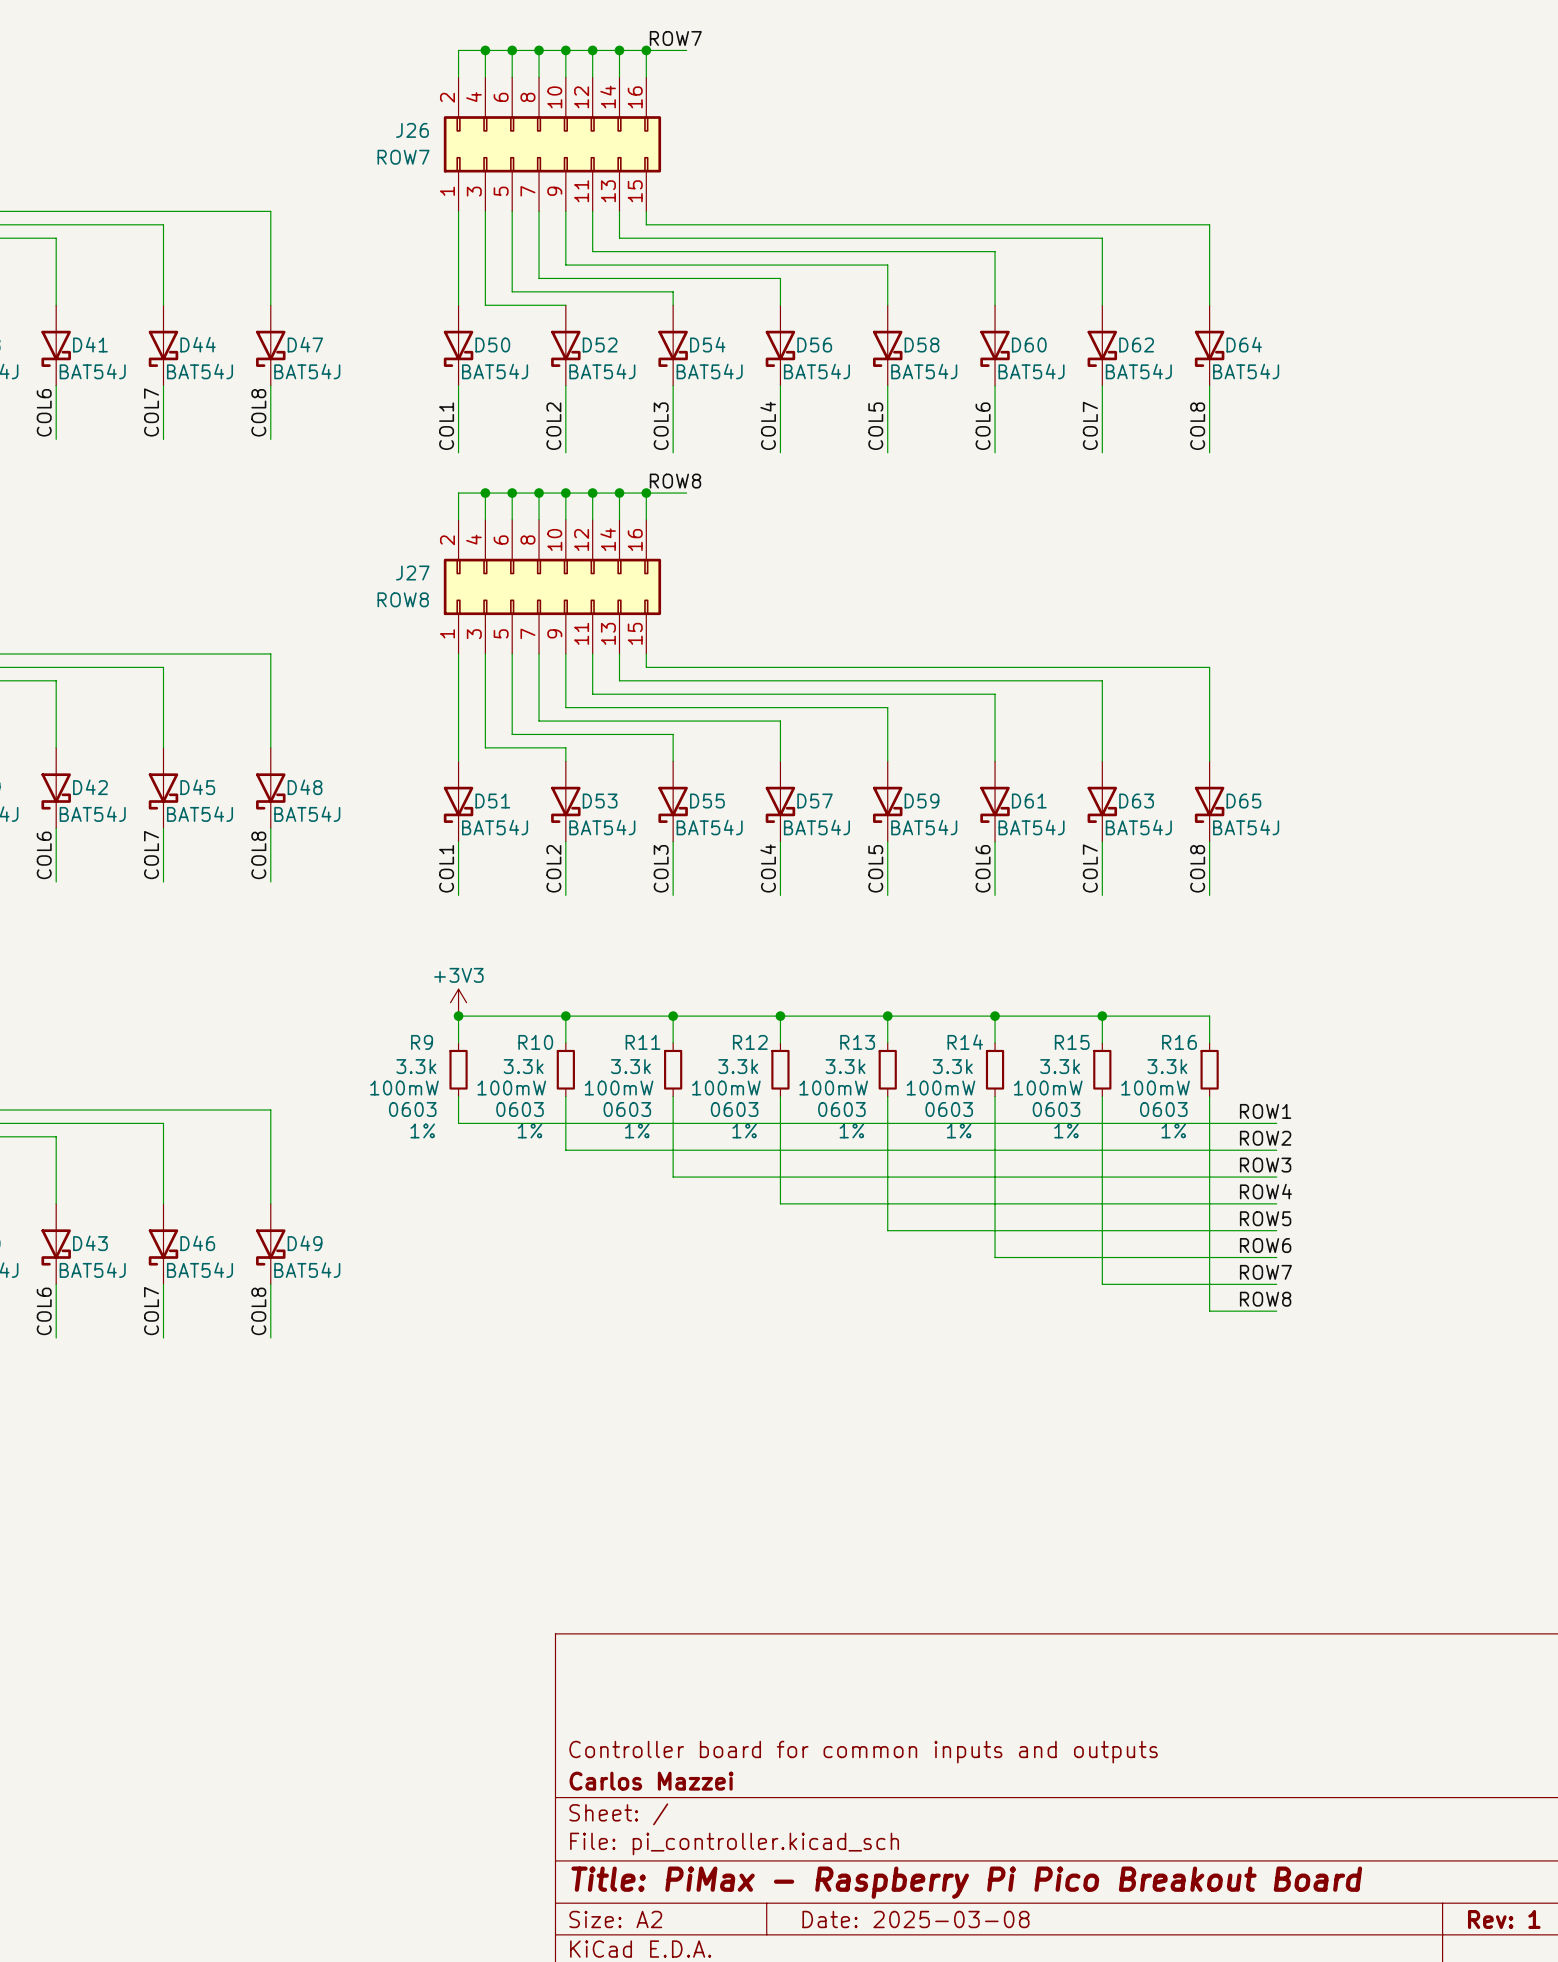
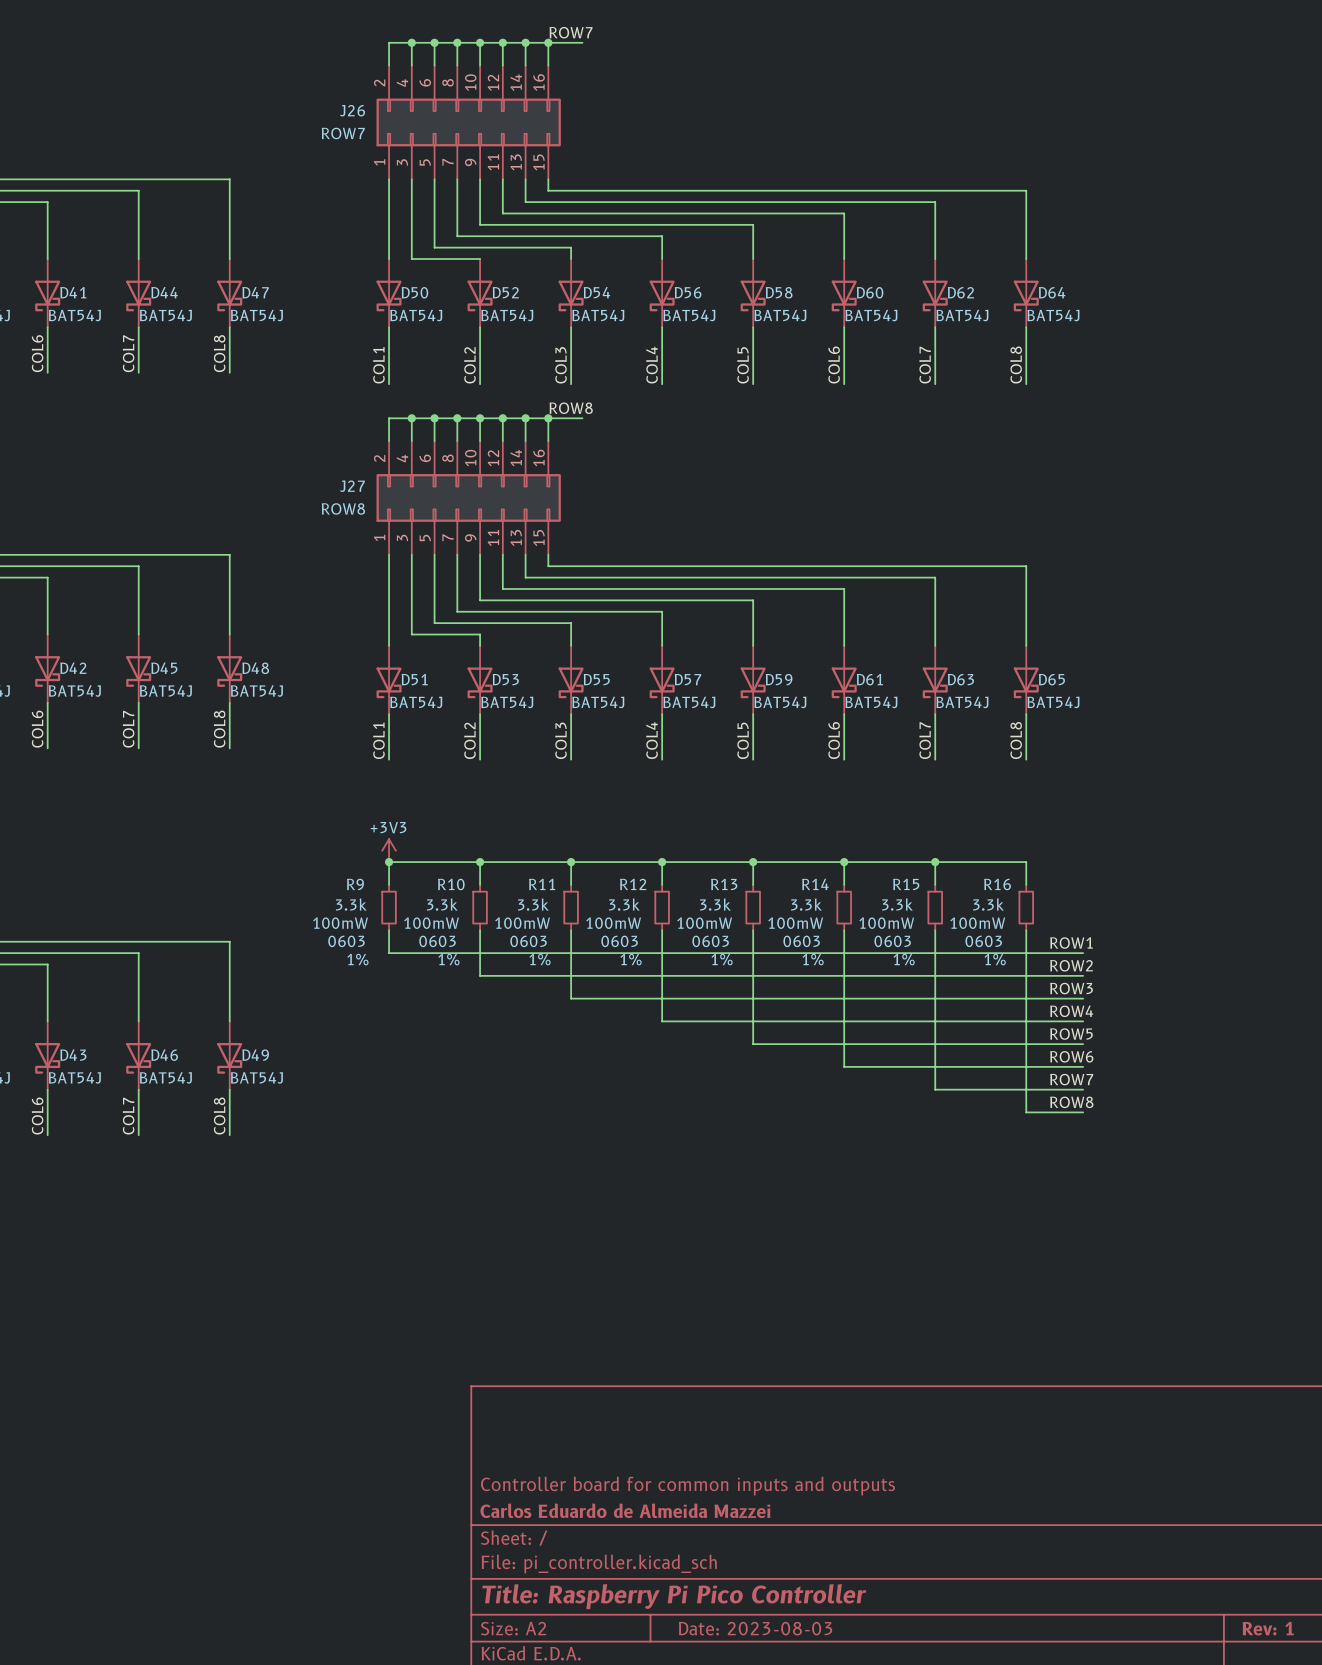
title block: Carlos Mazzei (651, 1781) -> Carlos Eduardo de Almeida Mazzei (625, 1510)
title block: Title: PiMax - Raspberry Pi Pico Breakout Board (966, 1882) -> Title: Raspberry Pi Pico Controller (674, 1596)
title block: Date: 2025-03-08 (915, 1919) -> Date: 2023-08-03 (755, 1628)

